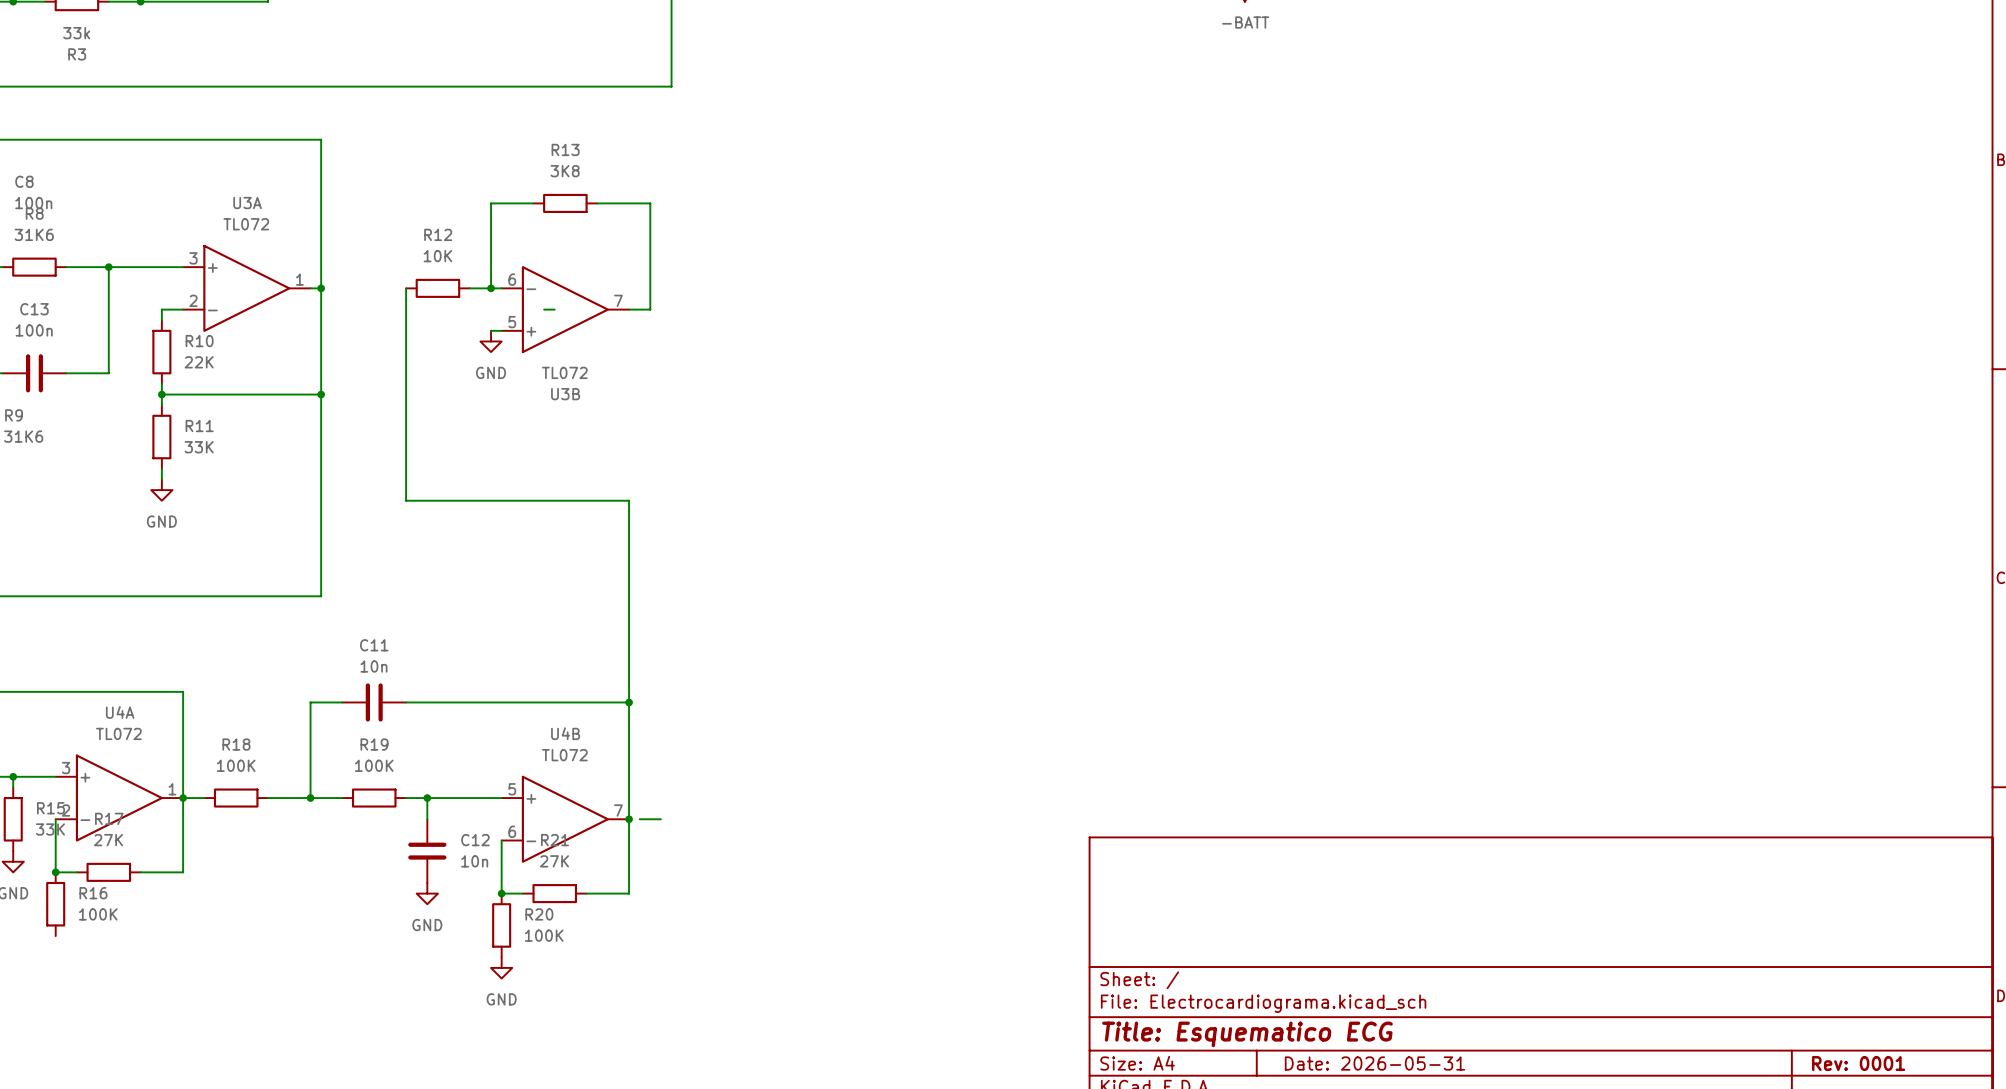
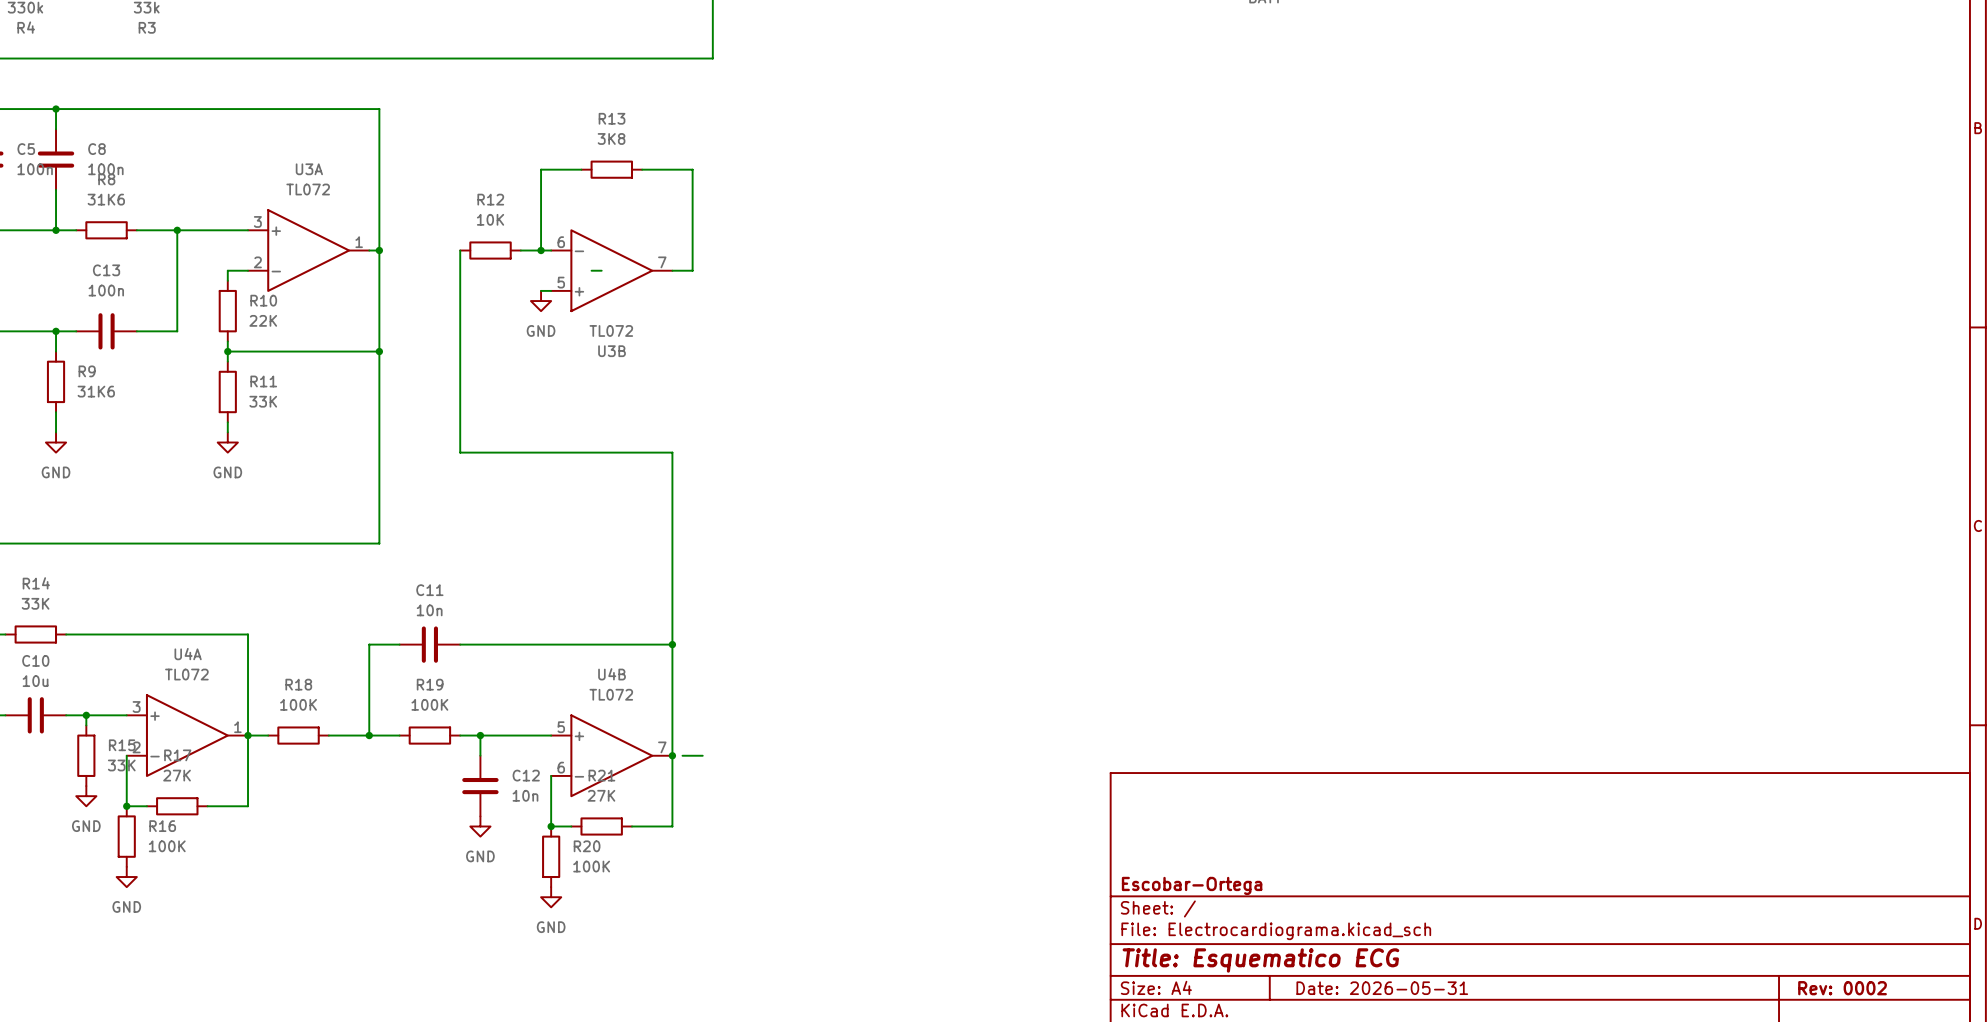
power symbol: none -> GND (126, 877)
title block: none -> Escobar-Ortega (1192, 885)
title block: Rev: 0001 (1858, 1063) -> Rev: 0002 (1842, 988)

